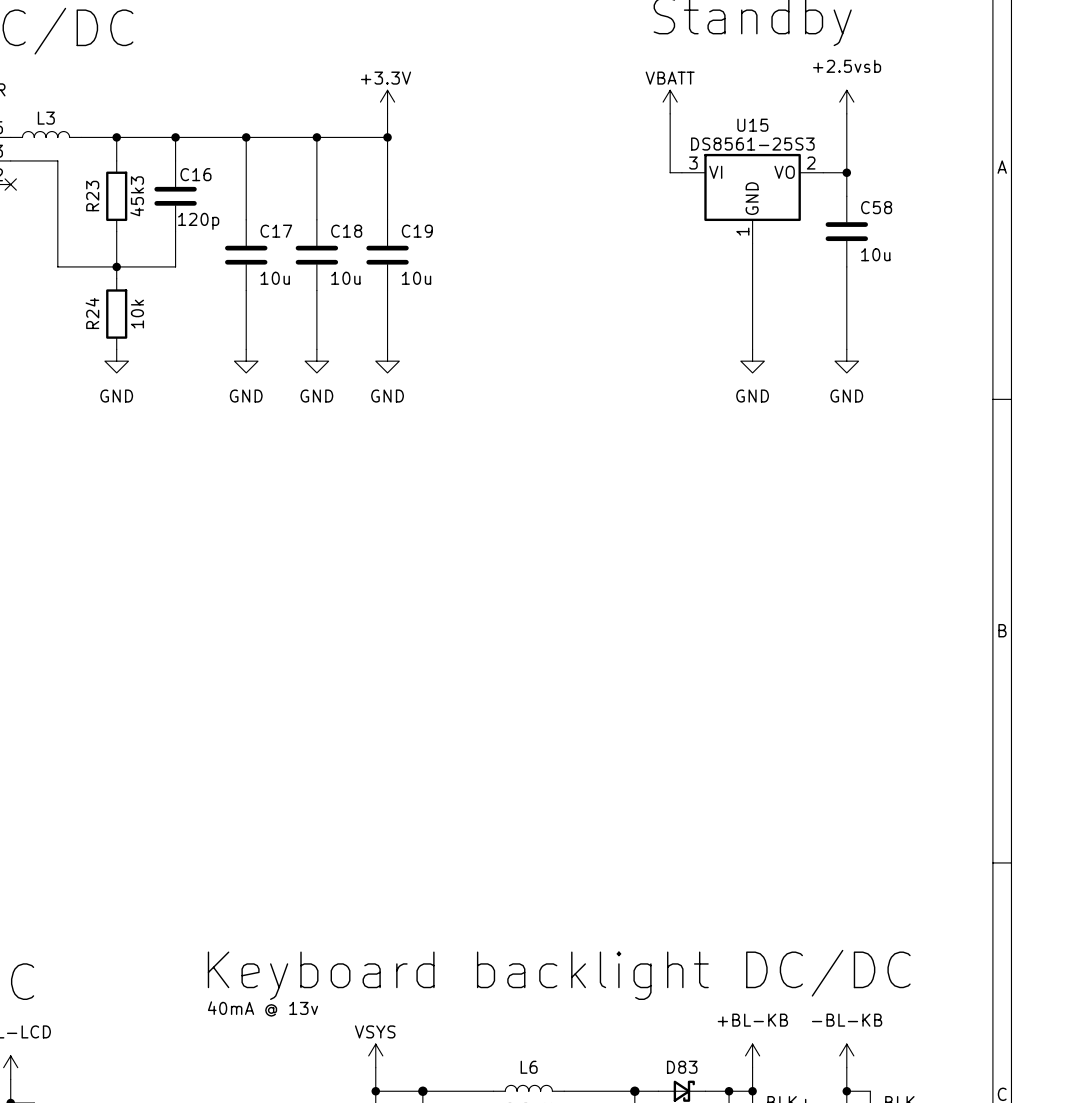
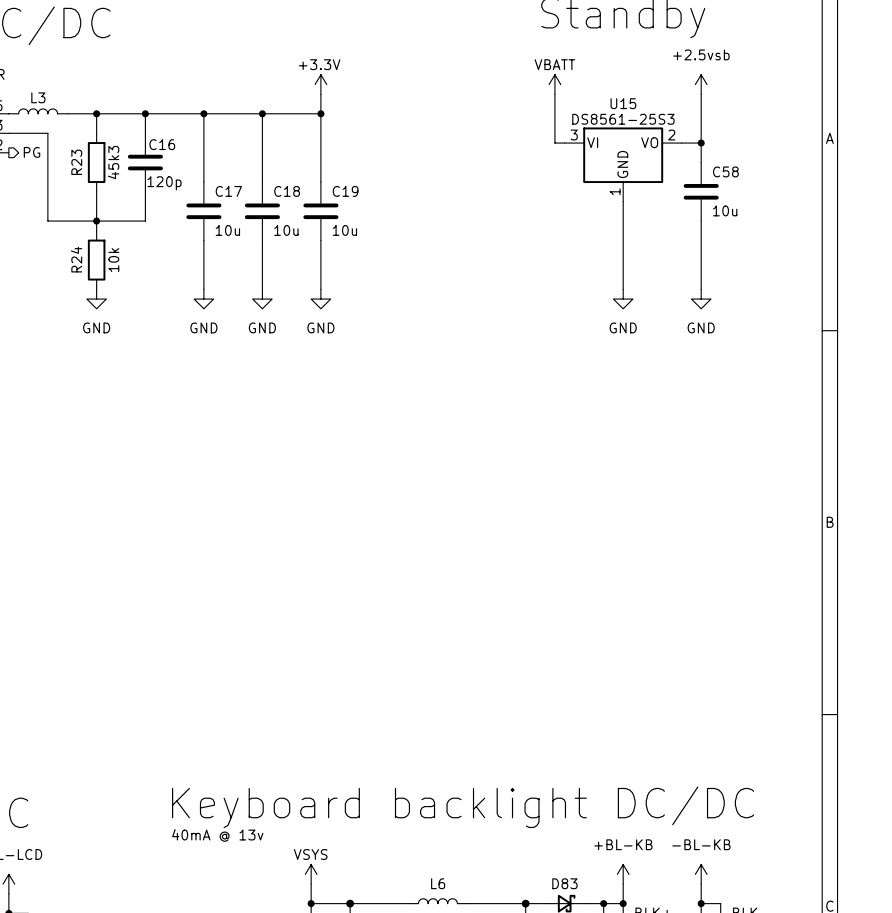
no-connect mark: (10, 184) -> none
hierarchical label: none -> PG (32, 152)

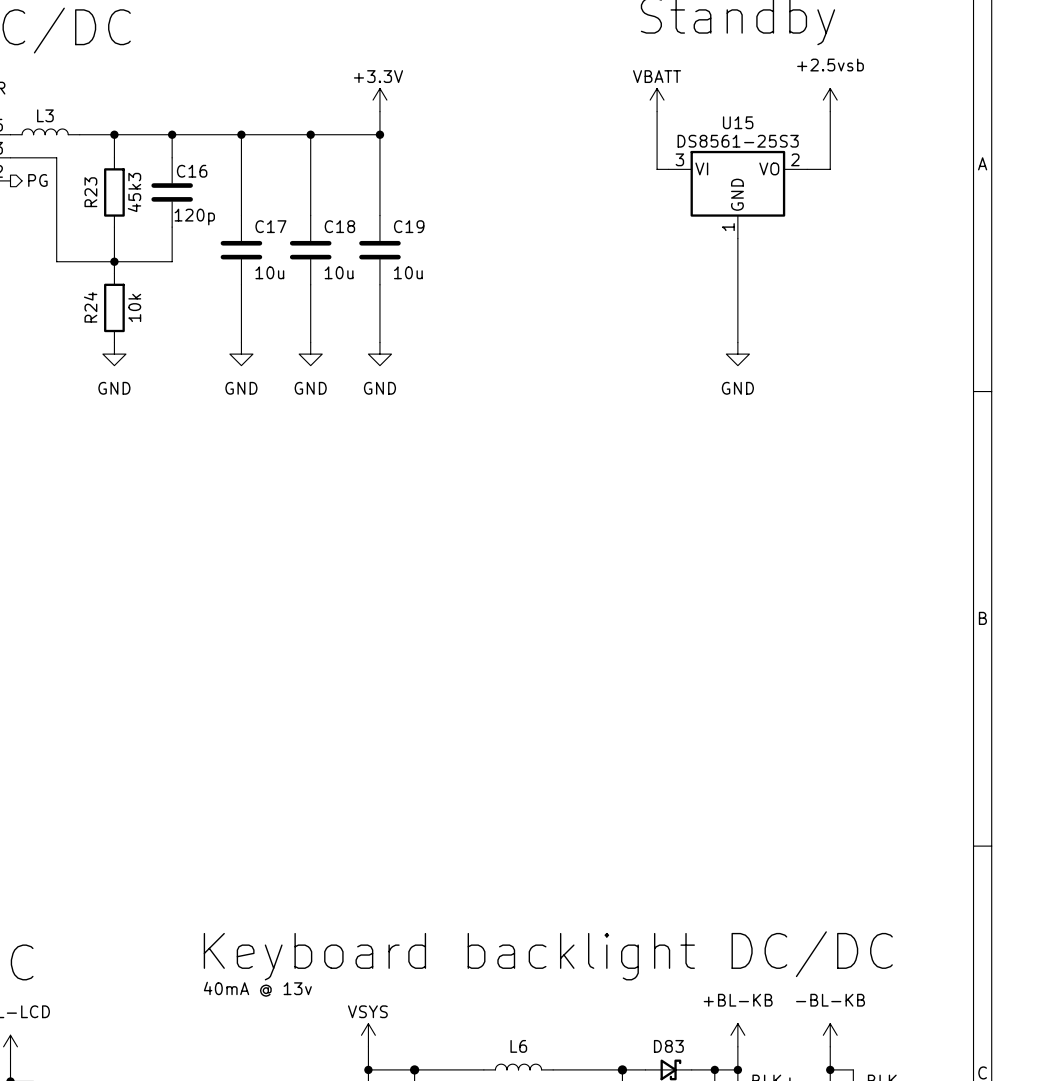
wire: (701, 143) (701, 162) -> none
junction: (701, 143) -> none
C58: 10u (701, 191) -> none
wire: (701, 221) (701, 289) -> none
power symbol: GND (701, 299) -> none

